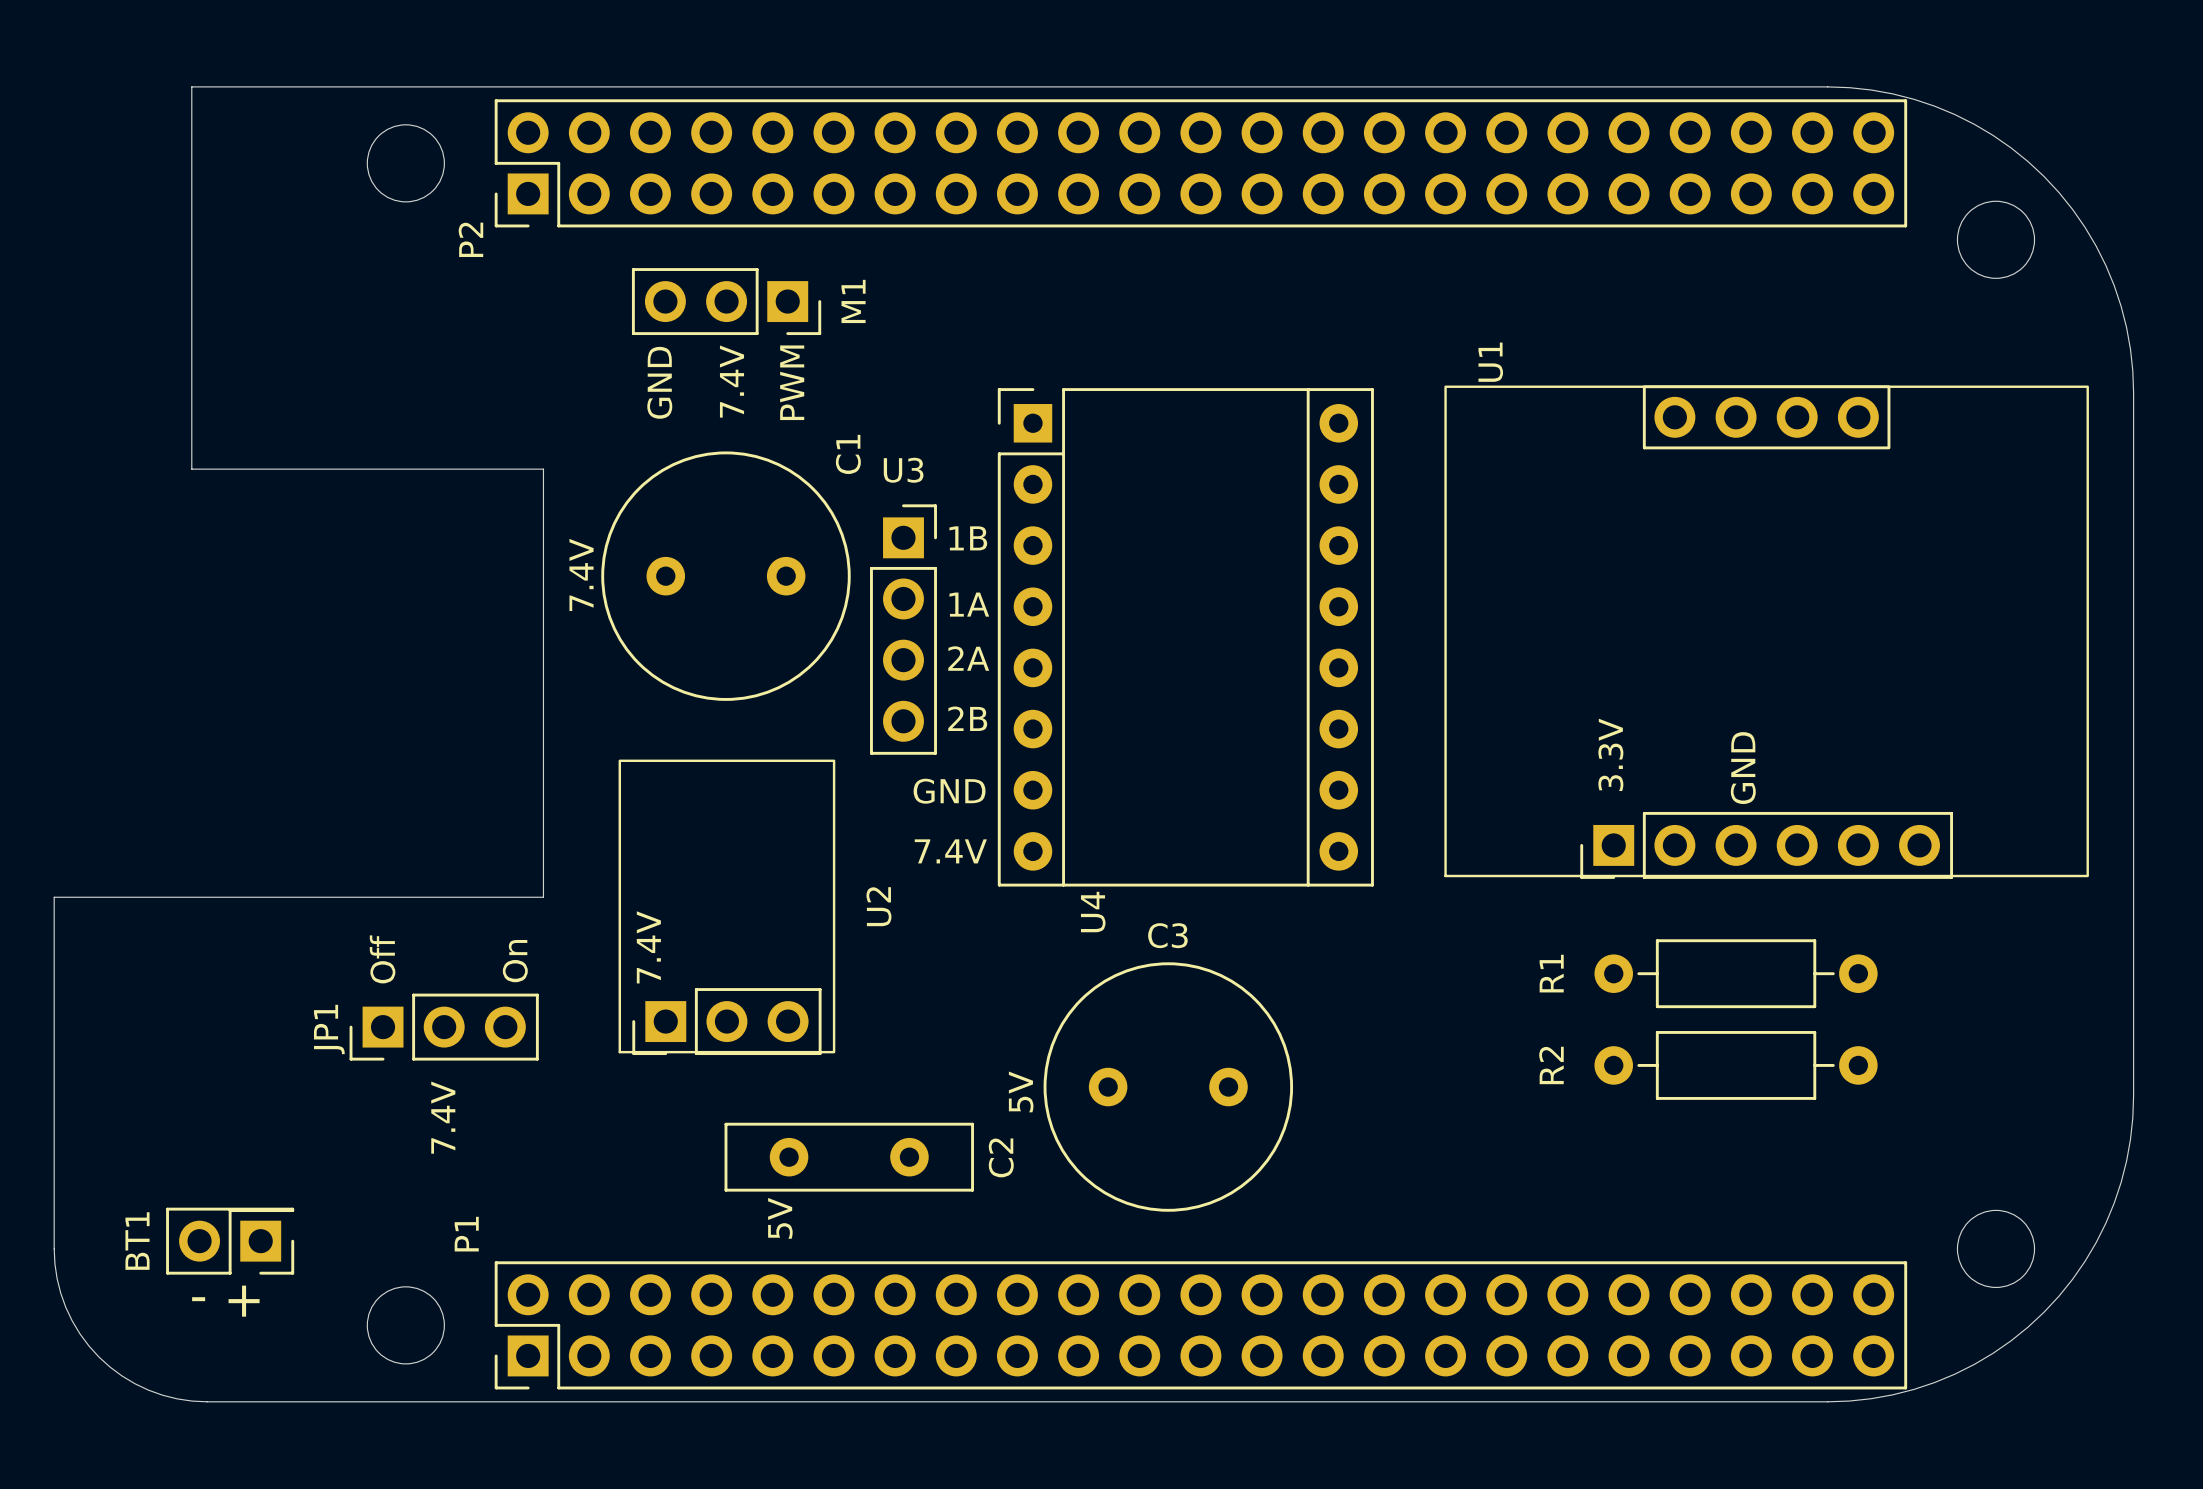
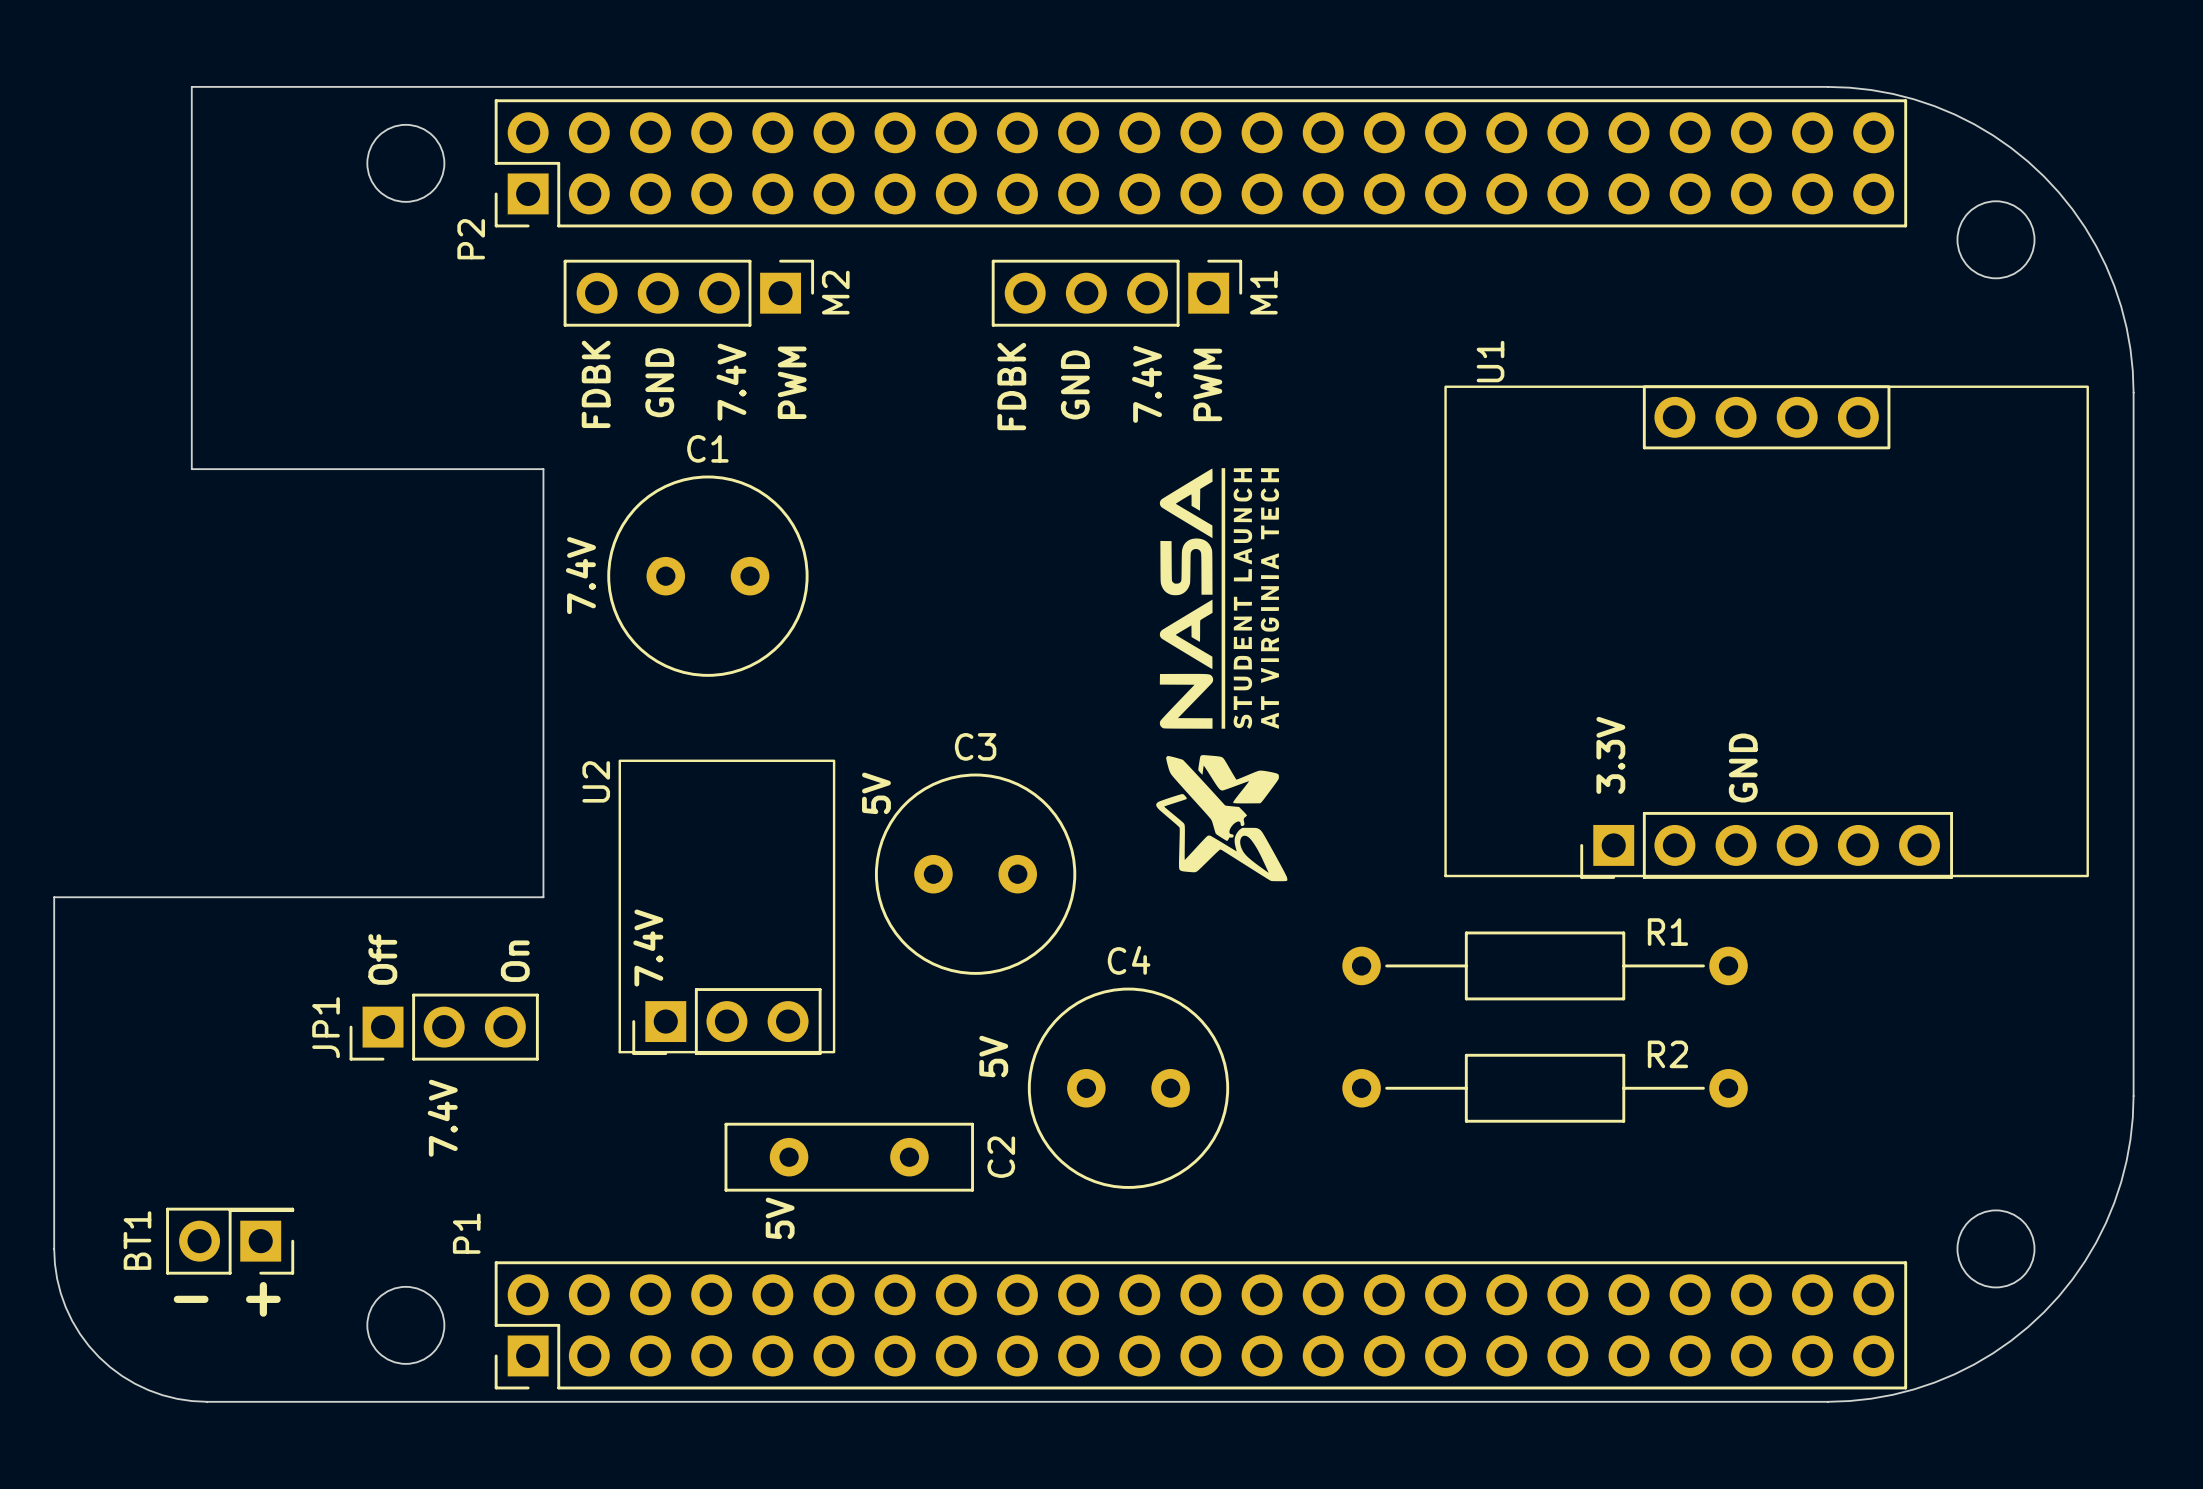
M1 footprint: [631, 268, 822, 336] -> [991, 259, 1243, 327]
M2: none -> (688, 293)
text: none -> FDBK (596, 384)
text: none -> PWM (1207, 384)
text: none -> FDBK (1011, 386)
C1 footprint: [601, 451, 851, 701] -> [607, 475, 809, 677]
C1 name position: C1 (848, 454) -> C1 (707, 448)
drawing: none -> [1156, 468, 1288, 882]
text: 1B (968, 538) -> none
text: 1A (969, 604) -> none
U3: (903, 629) -> none
U4: (1185, 637) -> none
text: 2A (968, 658) -> none
text: 2B (967, 718) -> none
text rotation: 0° (949, 791) -> 90° counterclockwise (1075, 384)
text position: GND (949, 791) -> GND (1075, 384)
text: none -> 5V (876, 793)
text rotation: 0° (950, 851) -> 90° counterclockwise (1147, 384)
text position: 7.4V (950, 851) -> 7.4V (1147, 384)
U2 name position: U2 (878, 906) -> U2 (596, 781)
R1 footprint: [1594, 939, 1878, 1009] -> [1342, 931, 1748, 1001]
C3 footprint: [1043, 962, 1294, 1212] -> [874, 773, 1077, 975]
R1 name position: R1 (1551, 973) -> R1 (1667, 932)
R2 footprint: [1594, 1031, 1878, 1100] -> [1342, 1053, 1748, 1123]
R2 name position: R2 (1551, 1065) -> R2 (1667, 1054)
C4: none -> (1128, 1088)
text position: 5V (1021, 1091) -> 5V (993, 1056)

